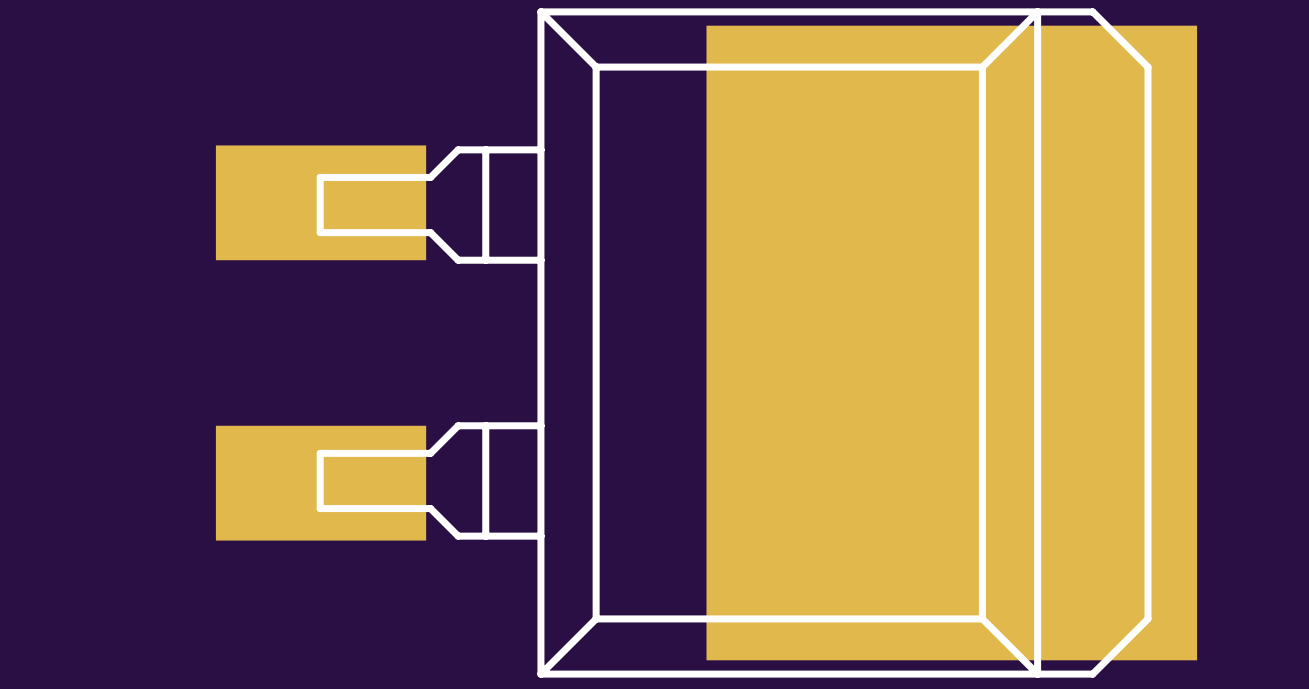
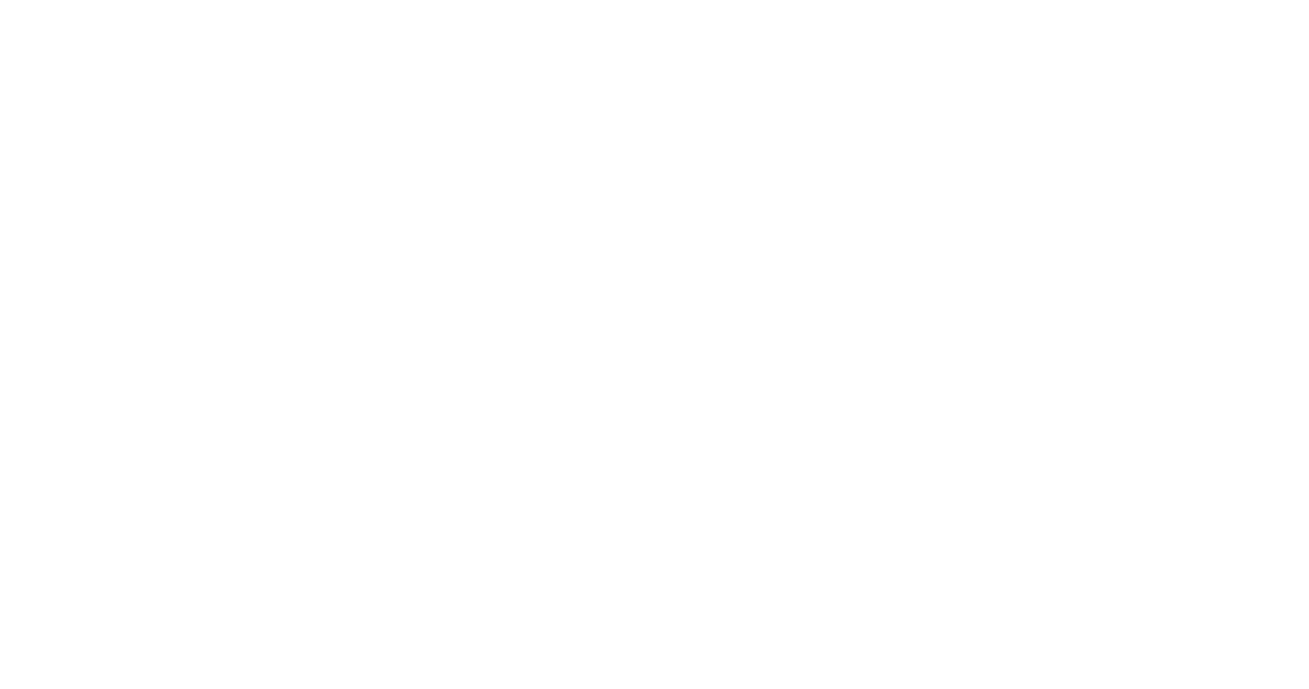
part: (706, 342) -> none

